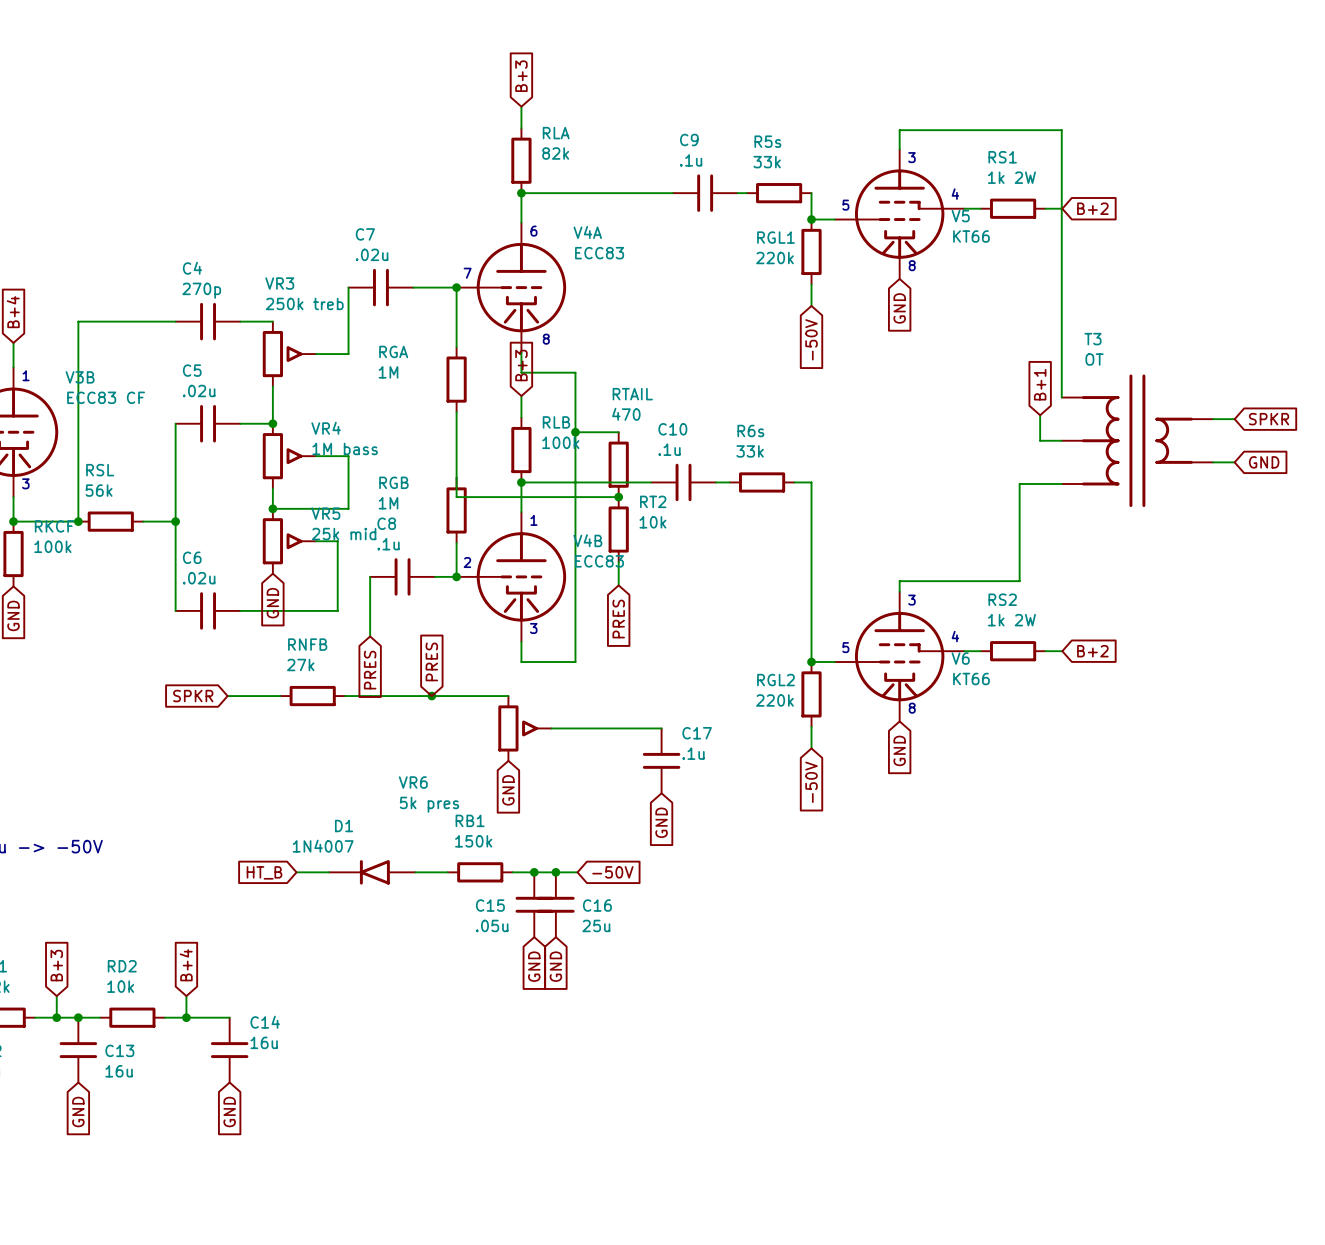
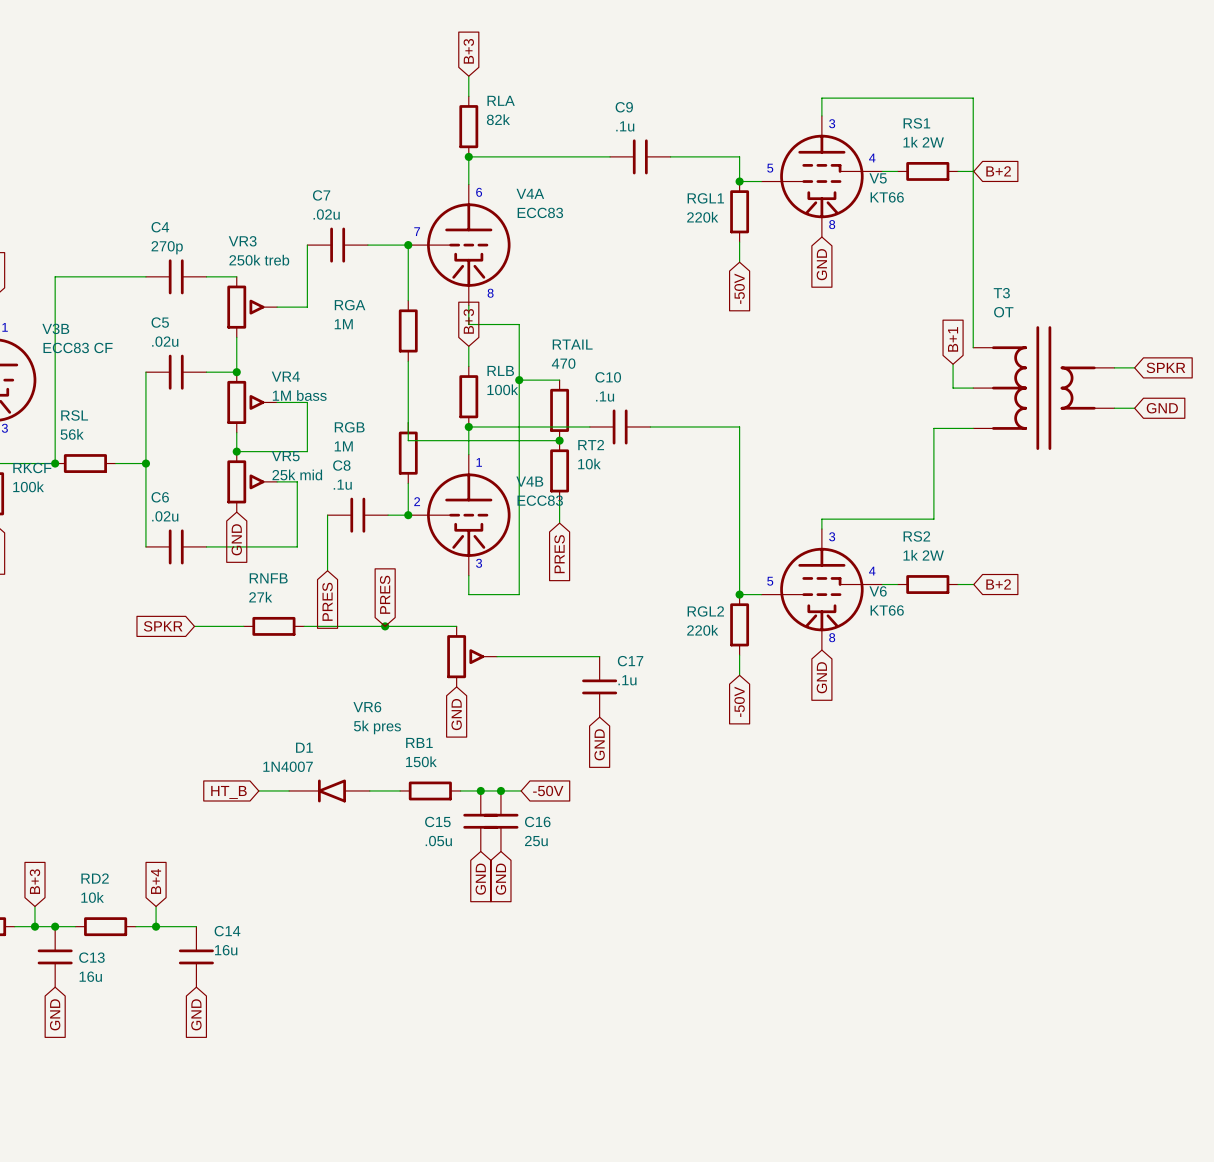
wire: none -> (679, 156) (739, 156)
R5s: 33k (779, 193) -> none
wire: none -> (663, 426) (723, 426)
R6s: 33k (762, 482) -> none

